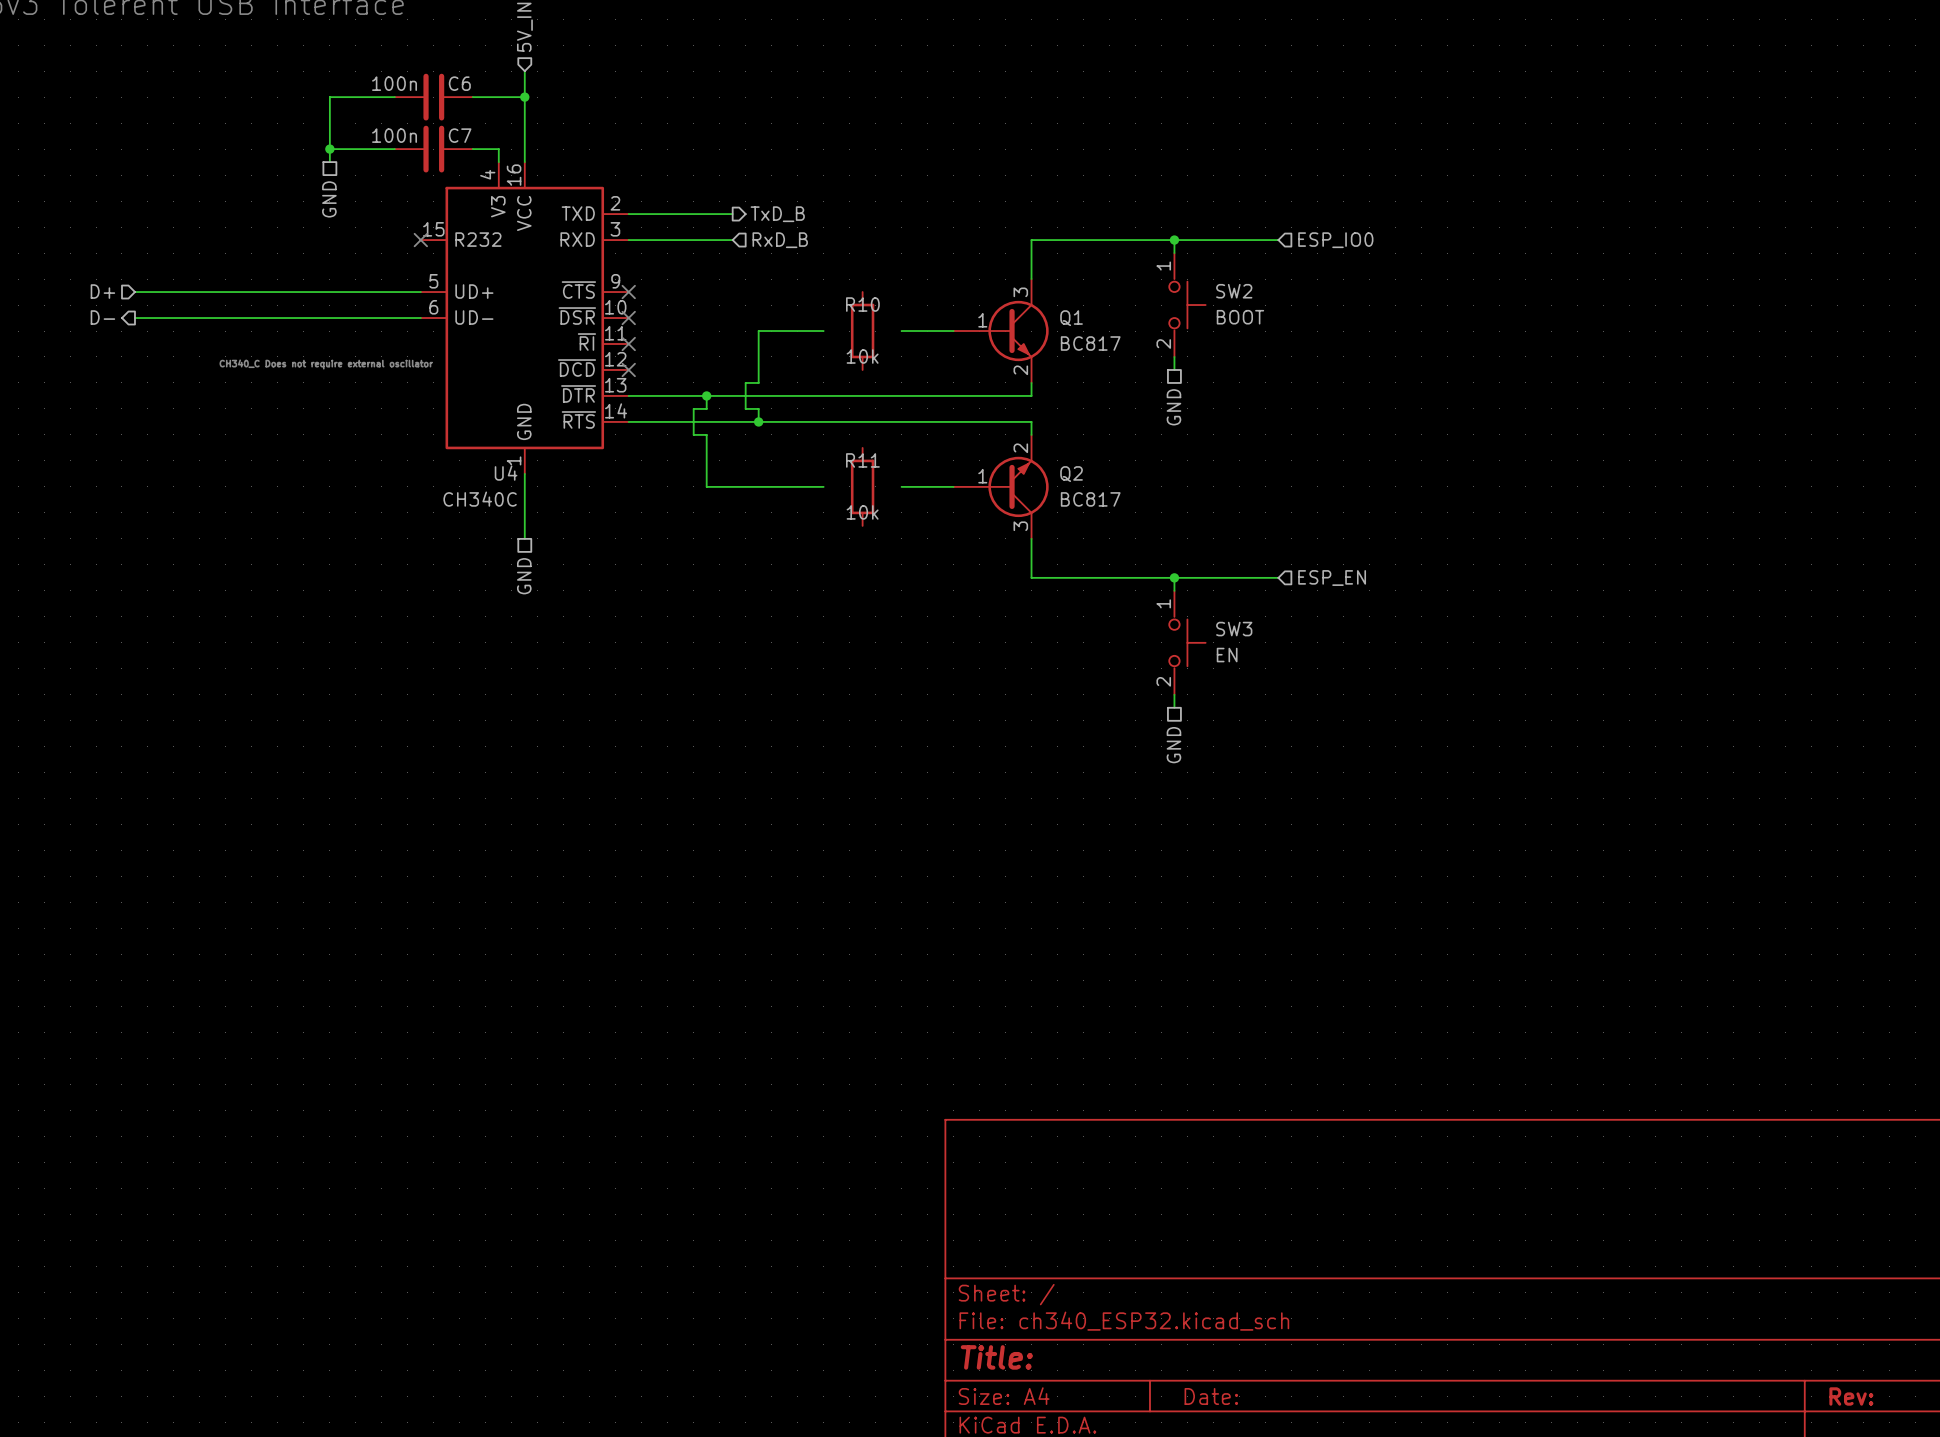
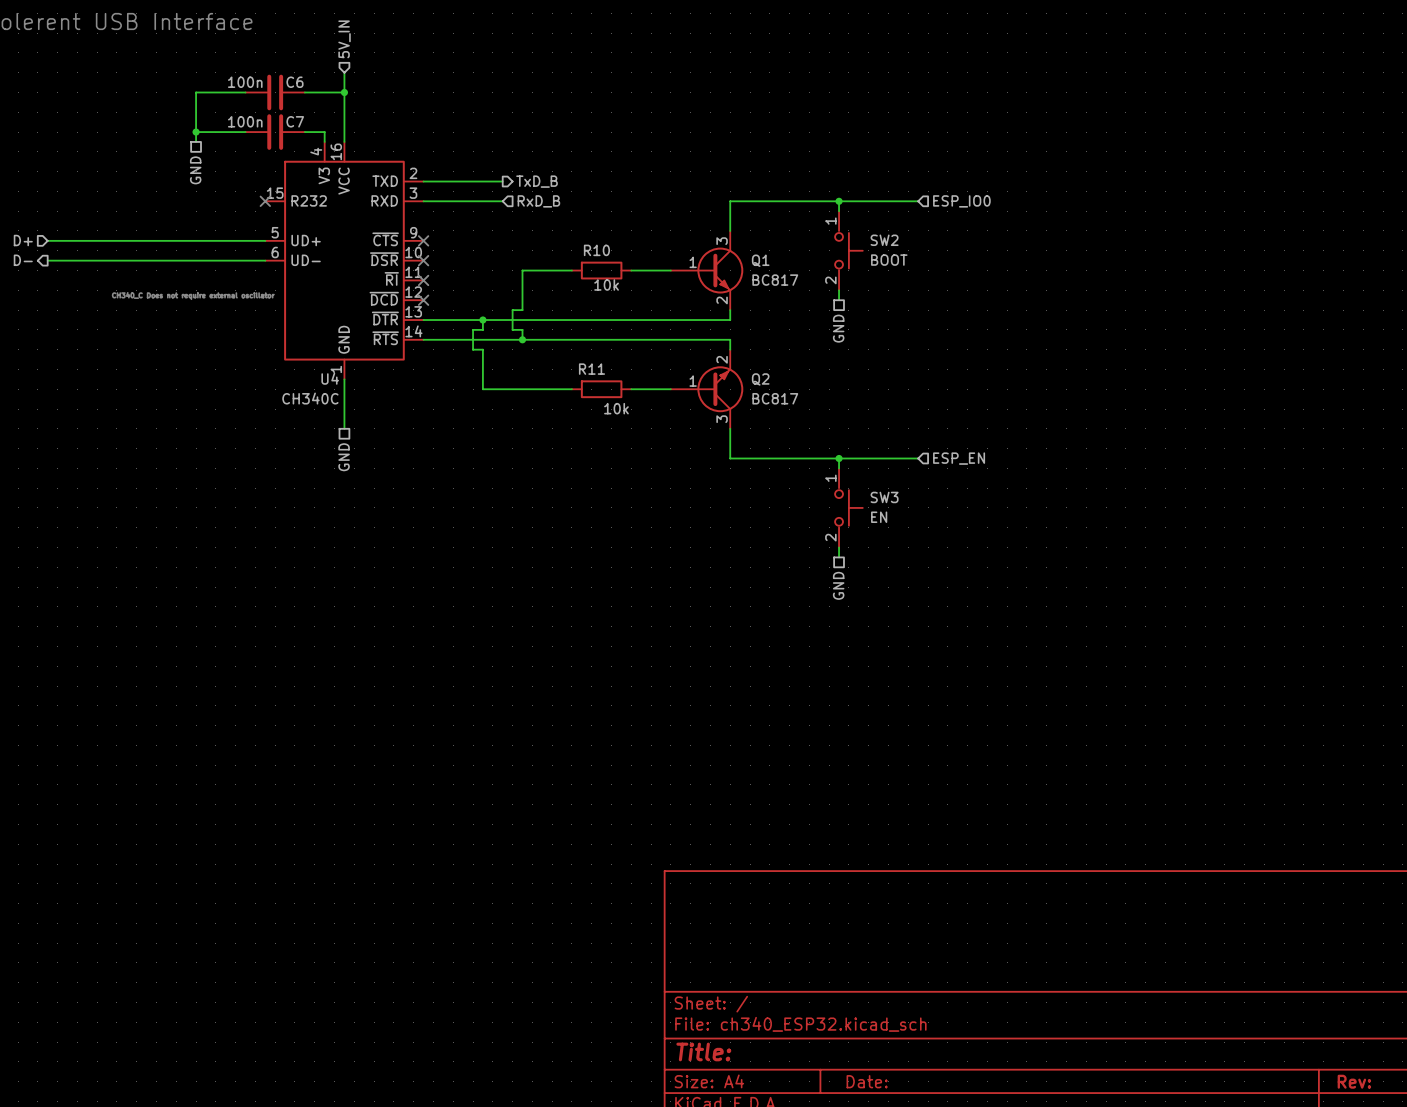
R10 rotation: 0° (862, 331) -> 90° clockwise (601, 270)
R11 rotation: 0° (862, 486) -> 90° clockwise (601, 389)

